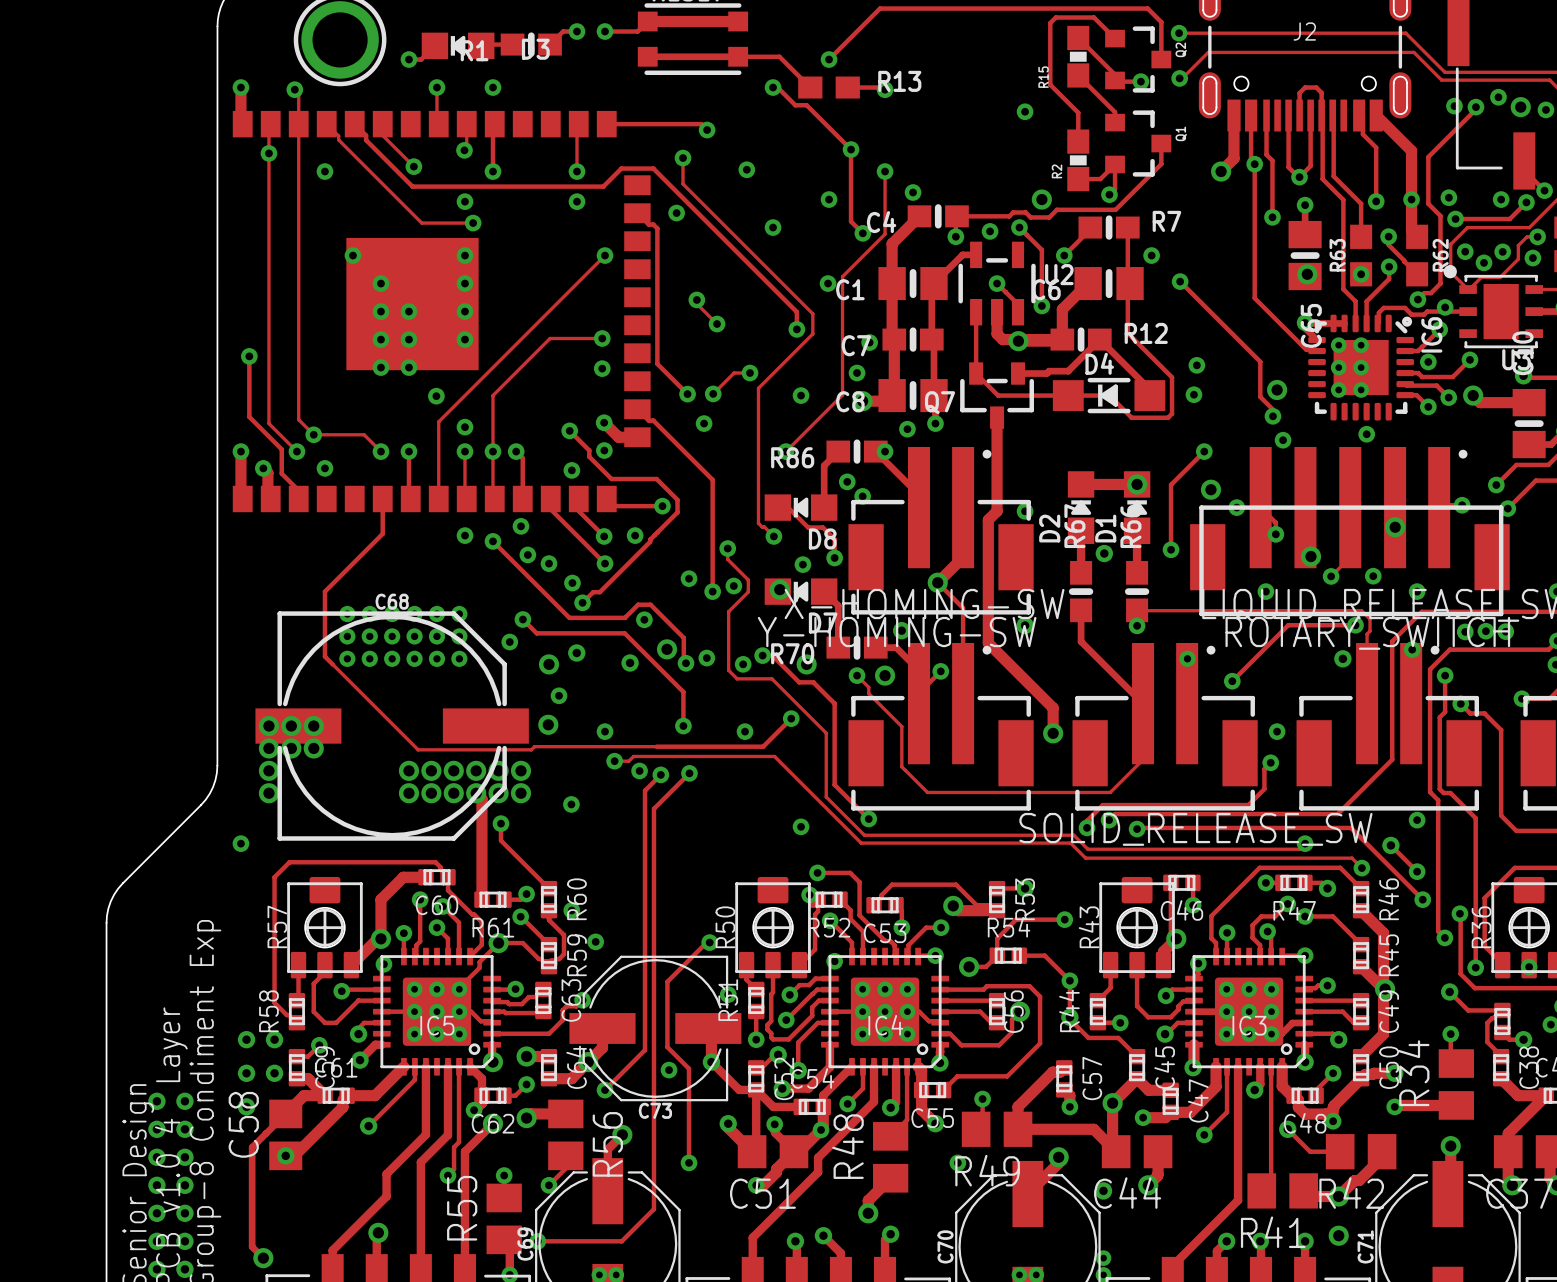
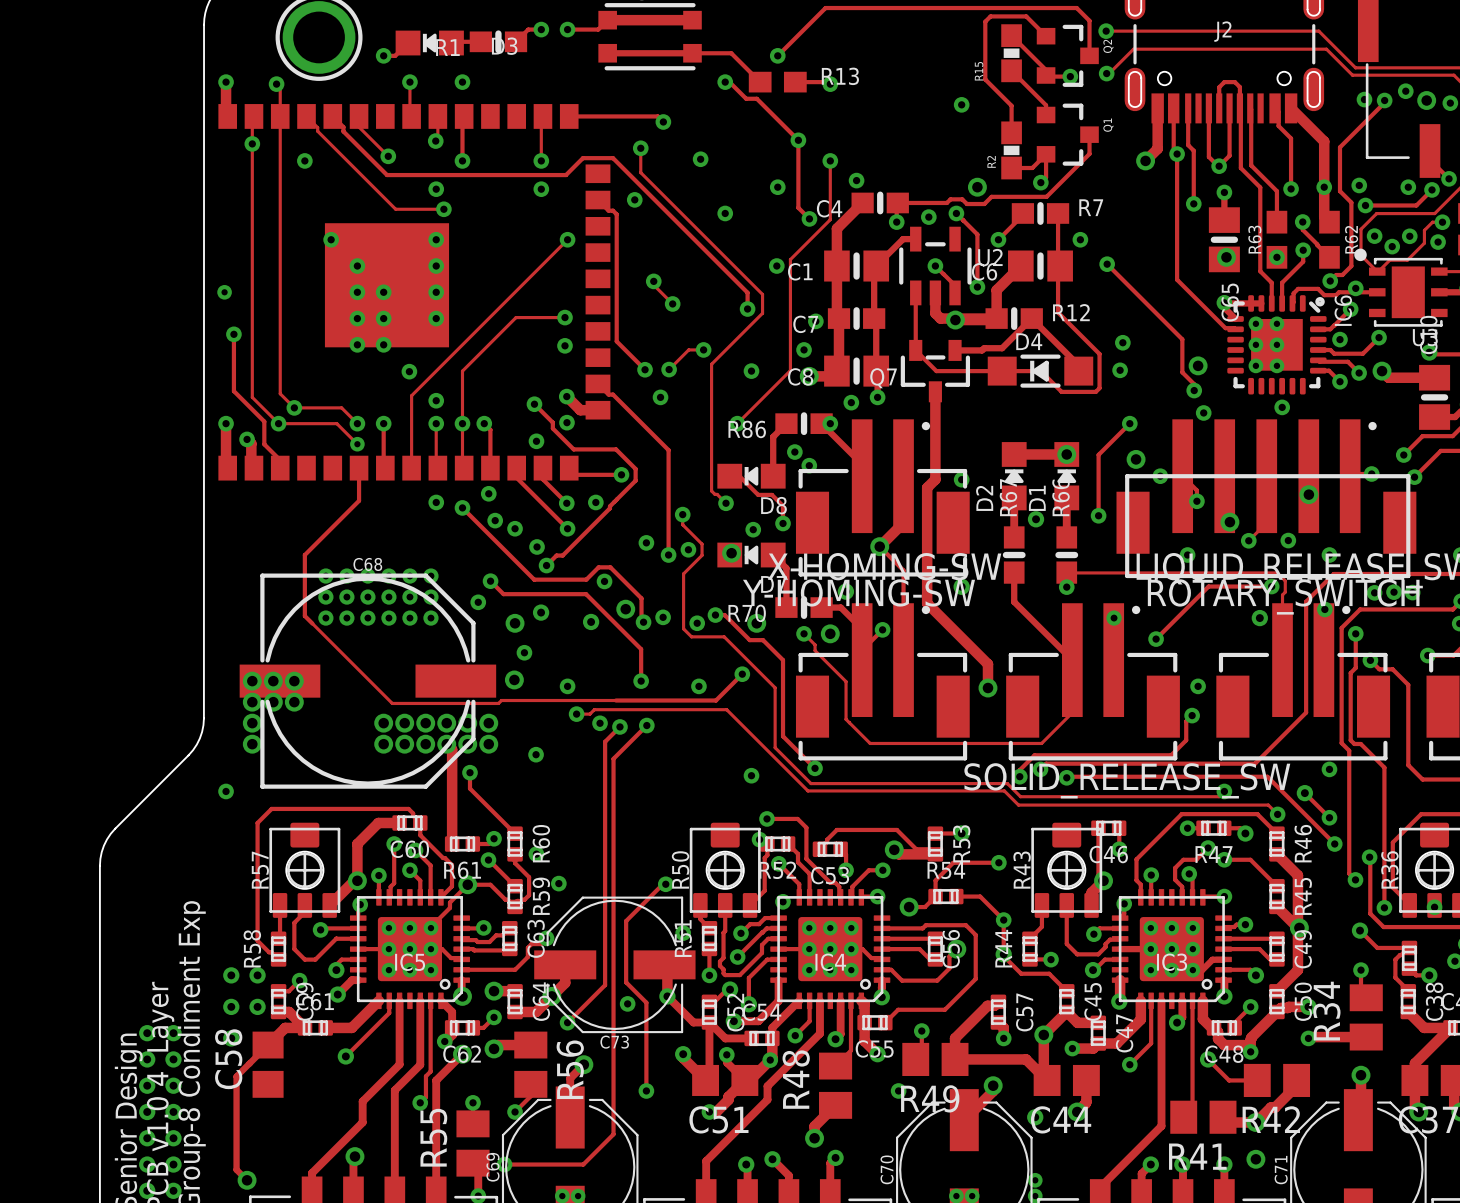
via: none -> (224, 292)
track: none -> (278, 423) (336, 423) (357, 444)
via: (324, 468) -> none
via: none -> (357, 444)
track: (342, 1099) (342, 1107) (294, 1155) (285, 1155) -> none
via: (285, 1155) -> none

